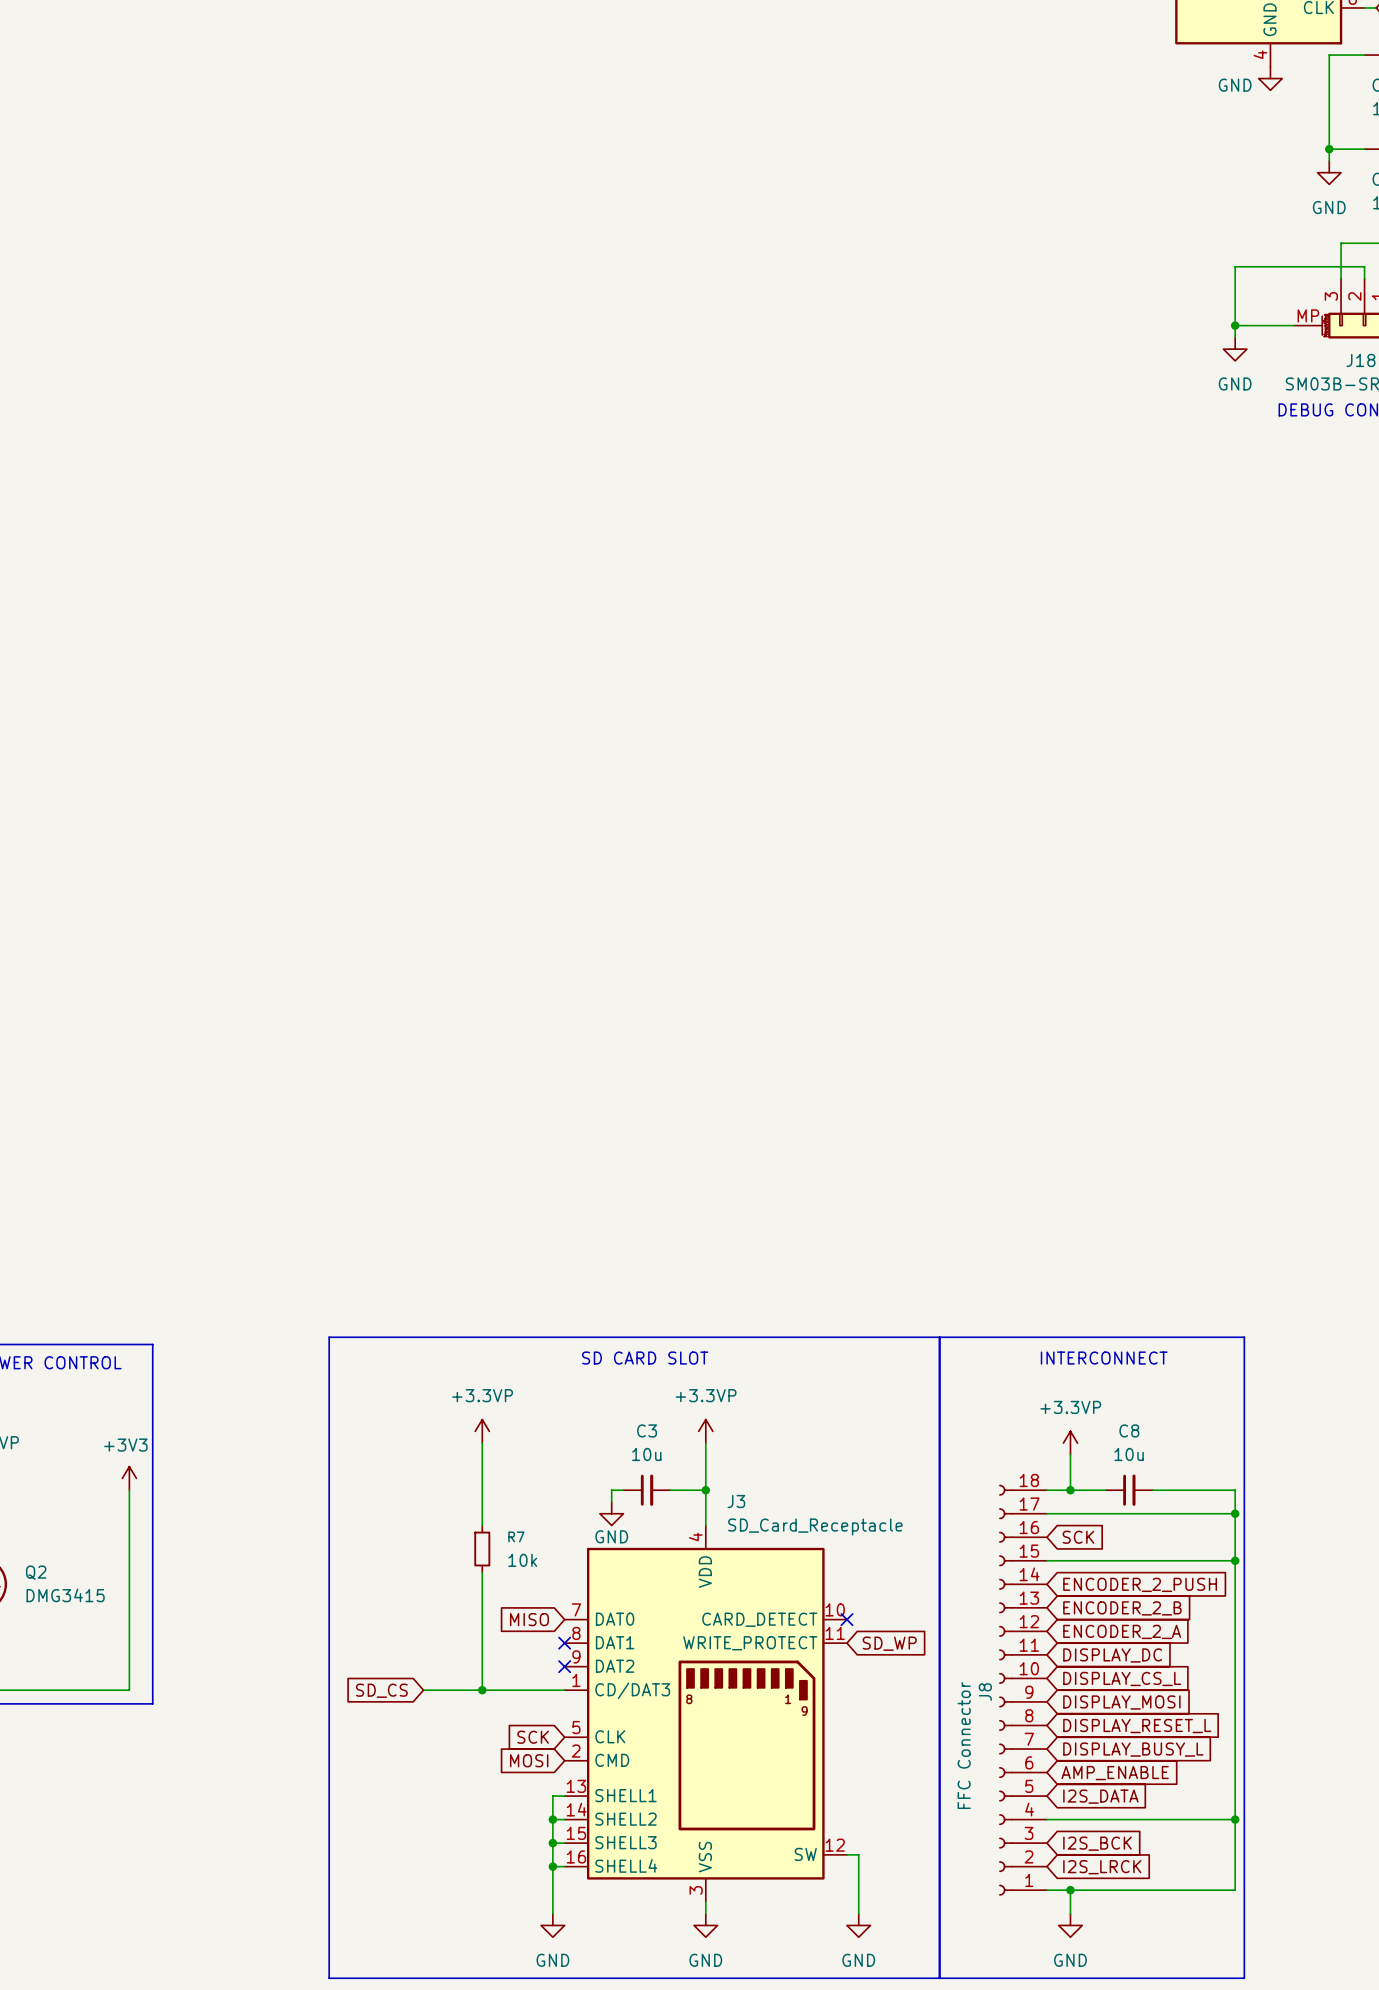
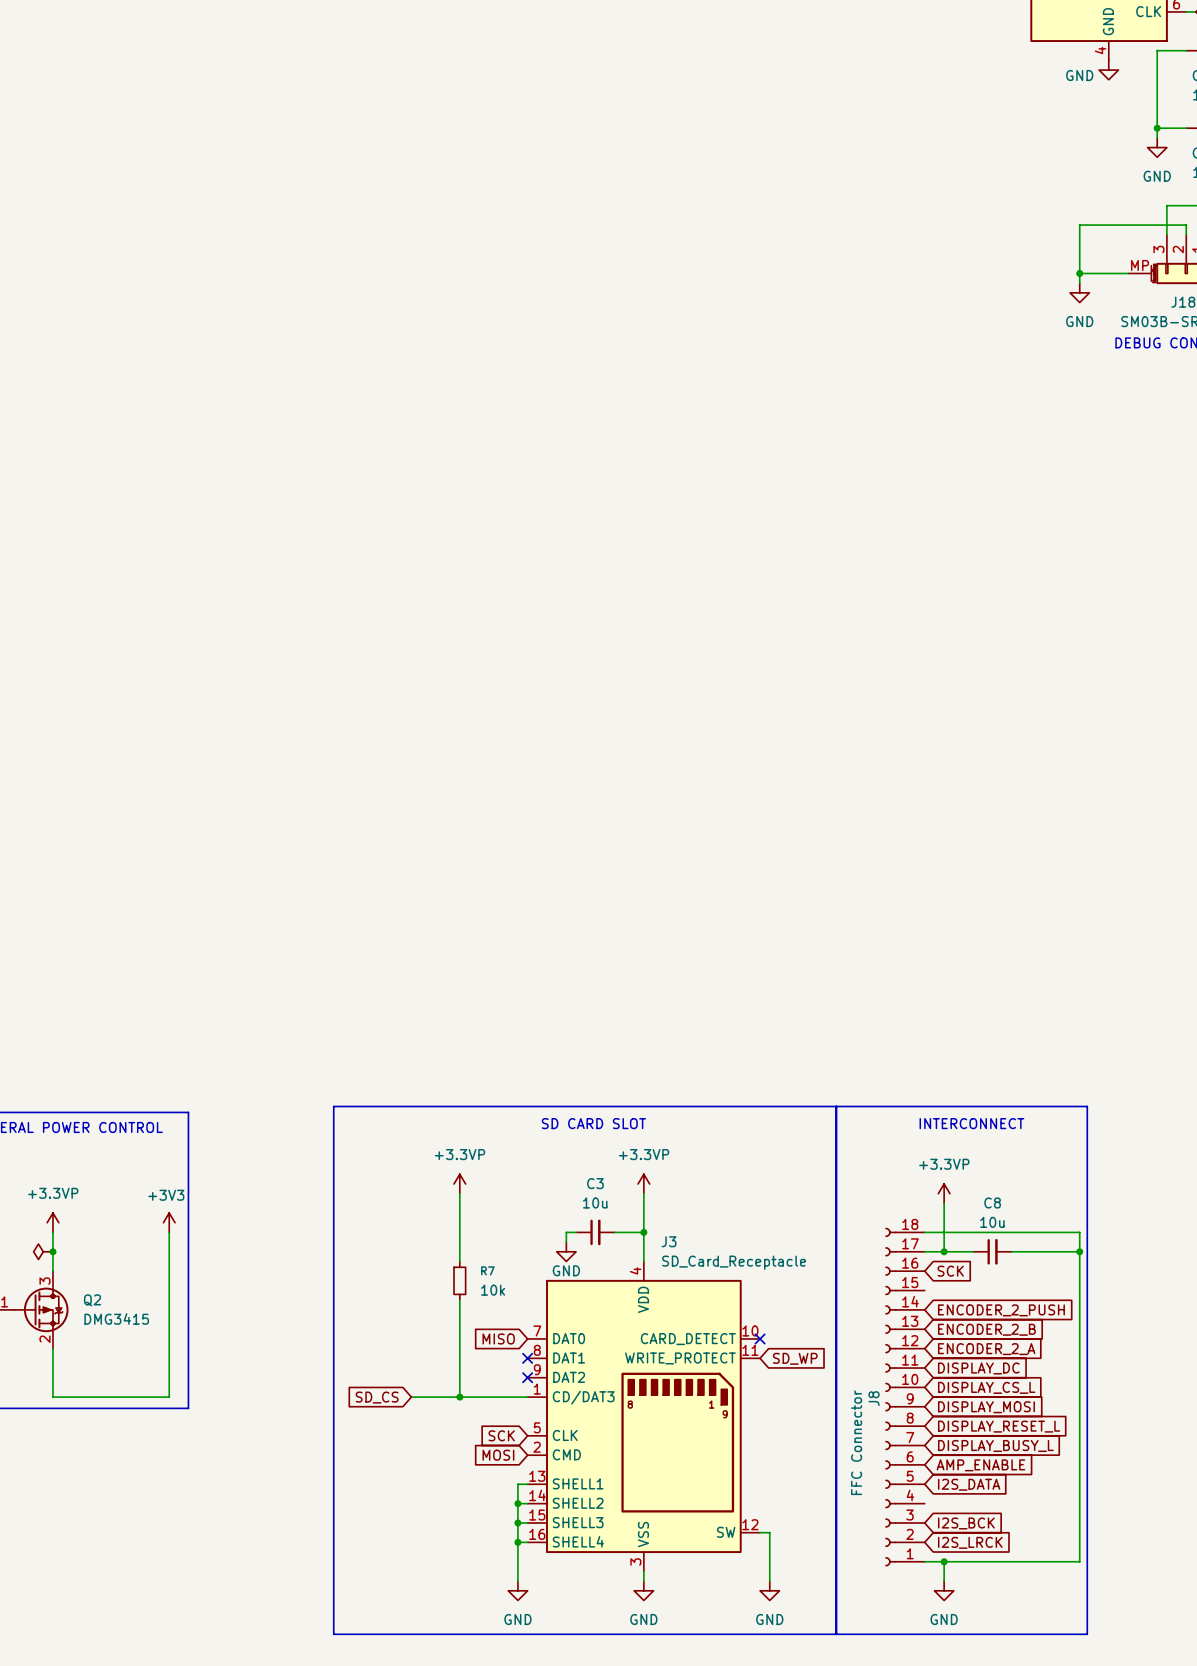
wire: none -> (944, 1232) (944, 1251)
junction position: (1070, 1490) -> (944, 1251)
C8 position: (1129, 1490) -> (992, 1251)
wire: (1046, 1560) (1235, 1560) -> none
junction: (1235, 1560) -> none
wire: (1046, 1819) (1235, 1819) -> none
junction: (1235, 1819) -> none

